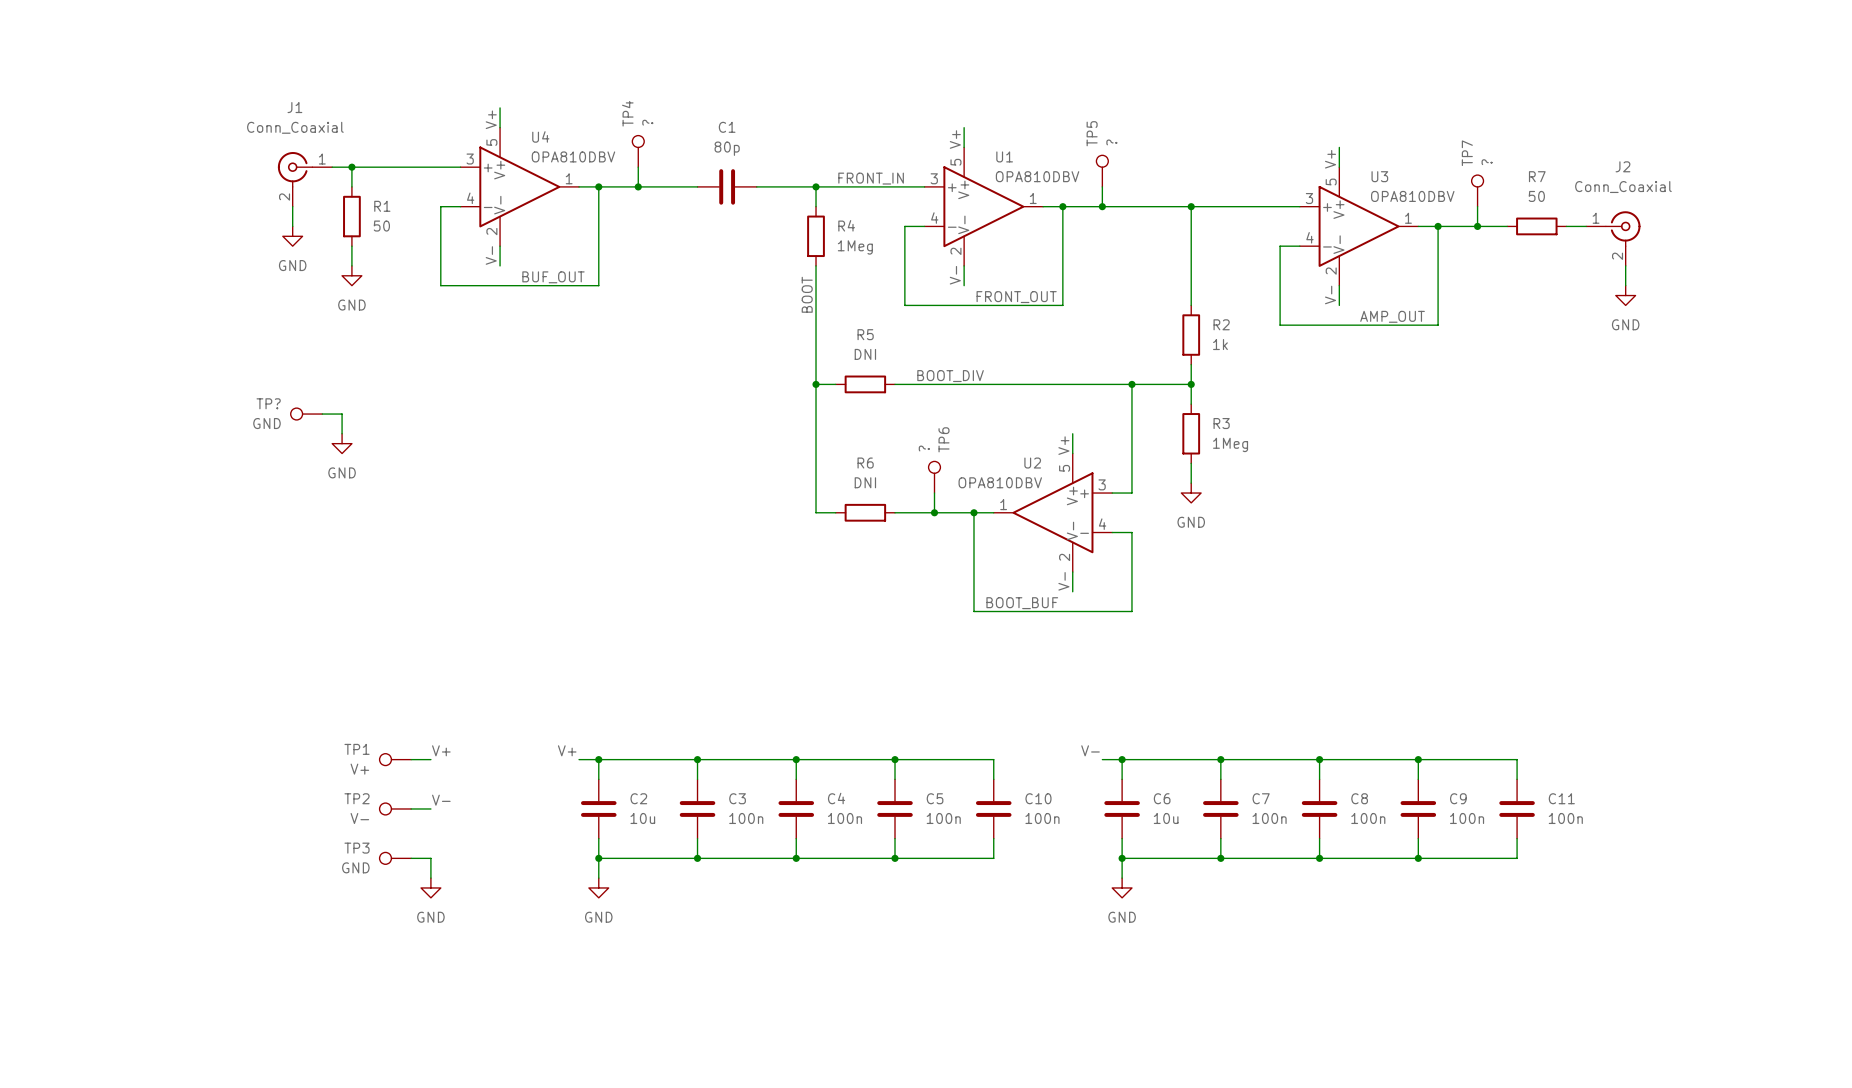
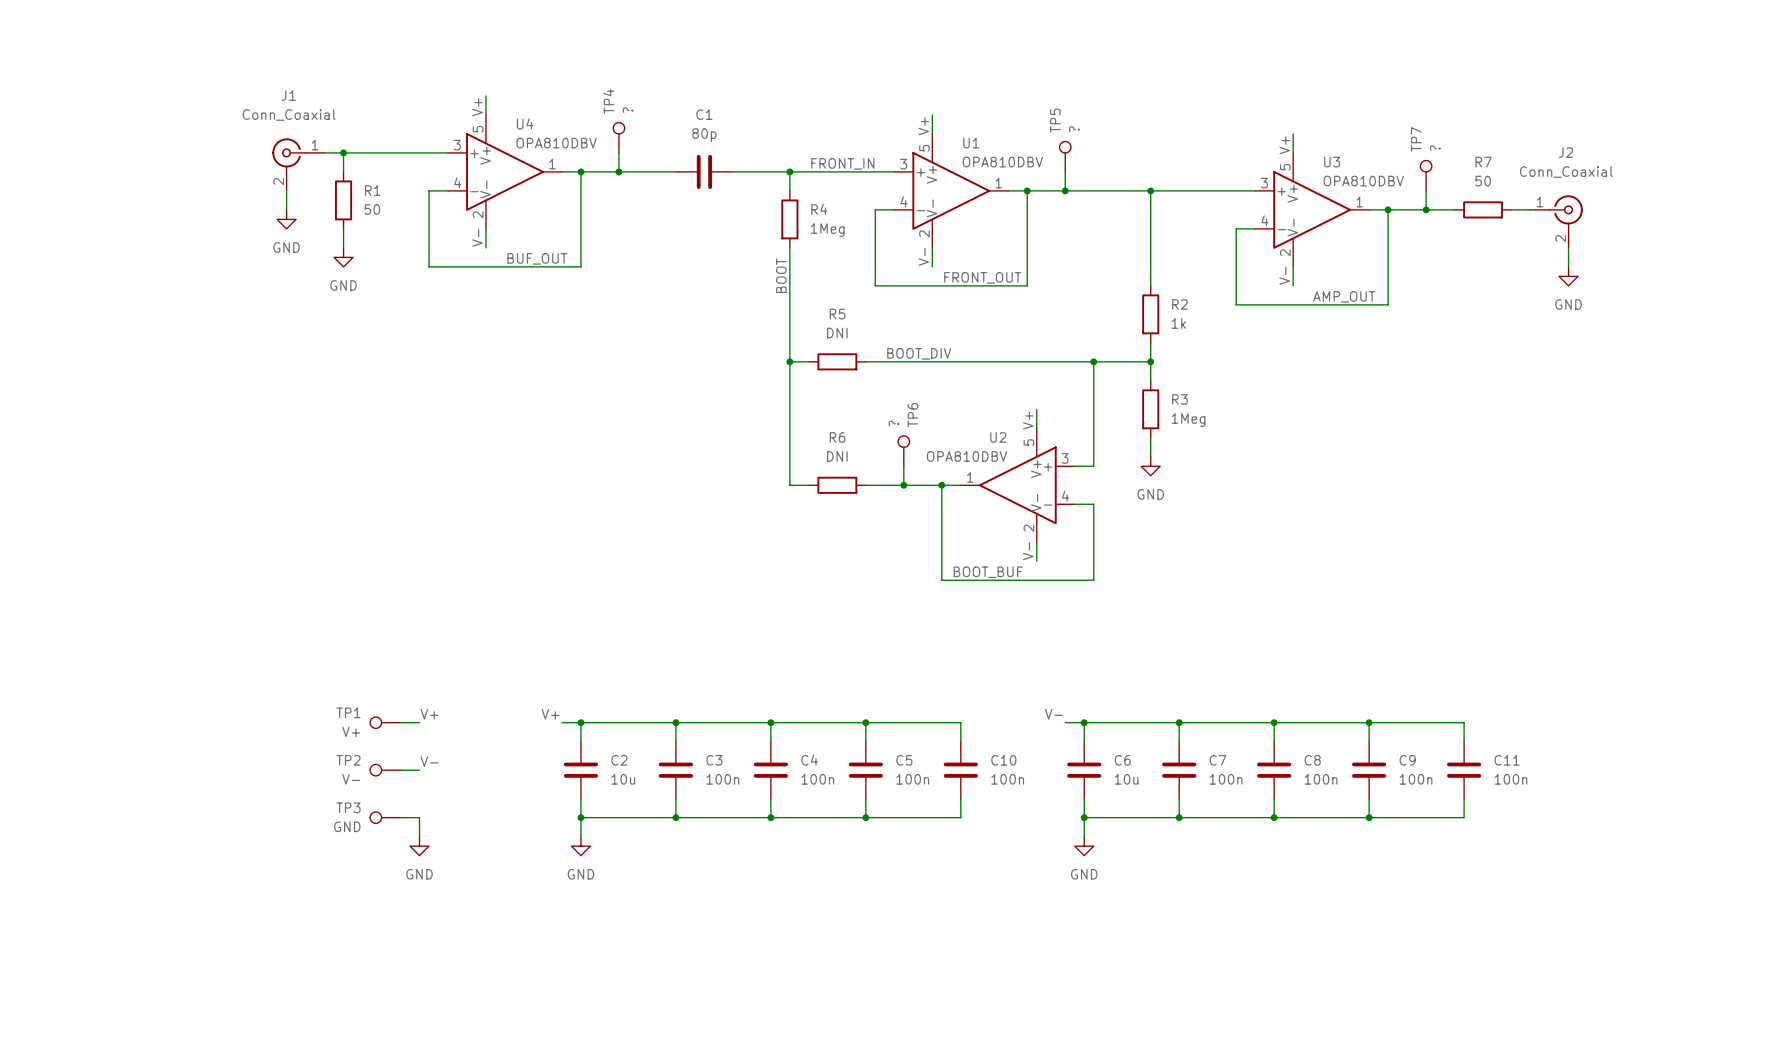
TP?: GND (306, 414) -> none
wire: (322, 414) (342, 414) (342, 433) -> none
power symbol: GND (342, 443) -> none

